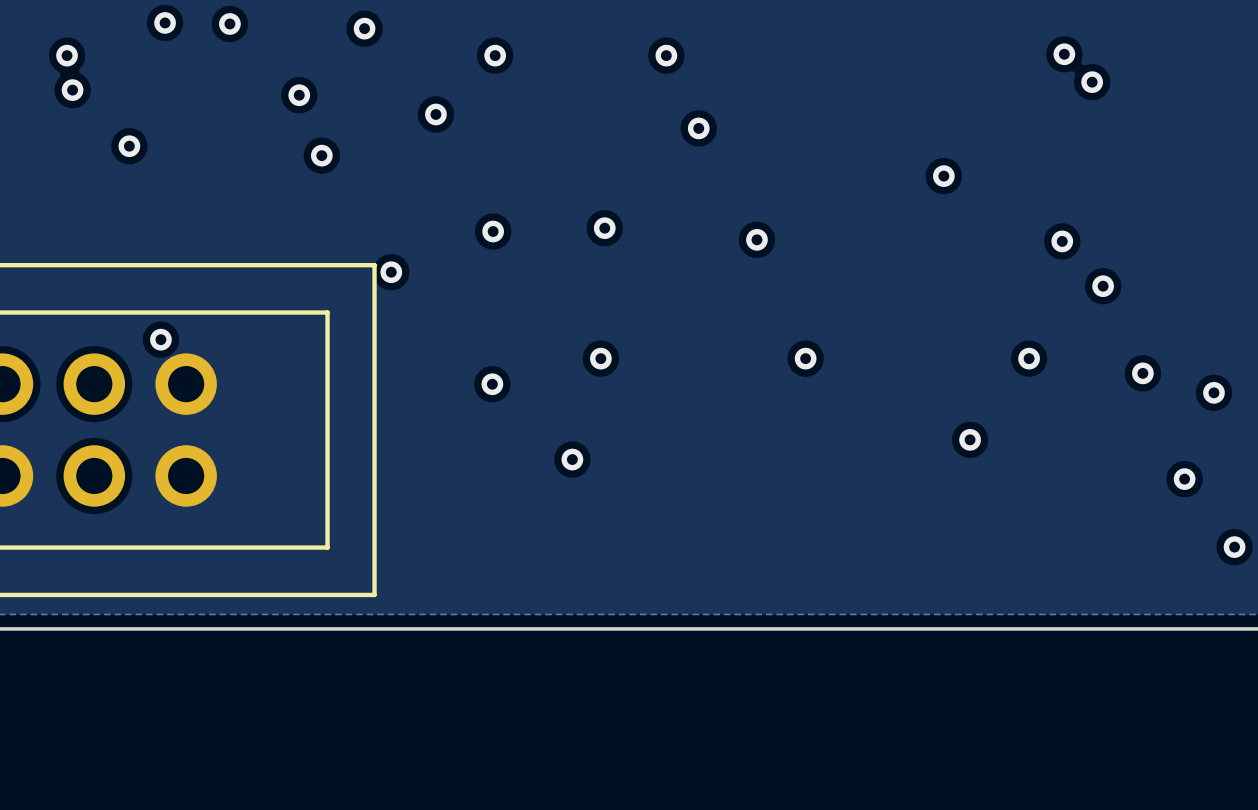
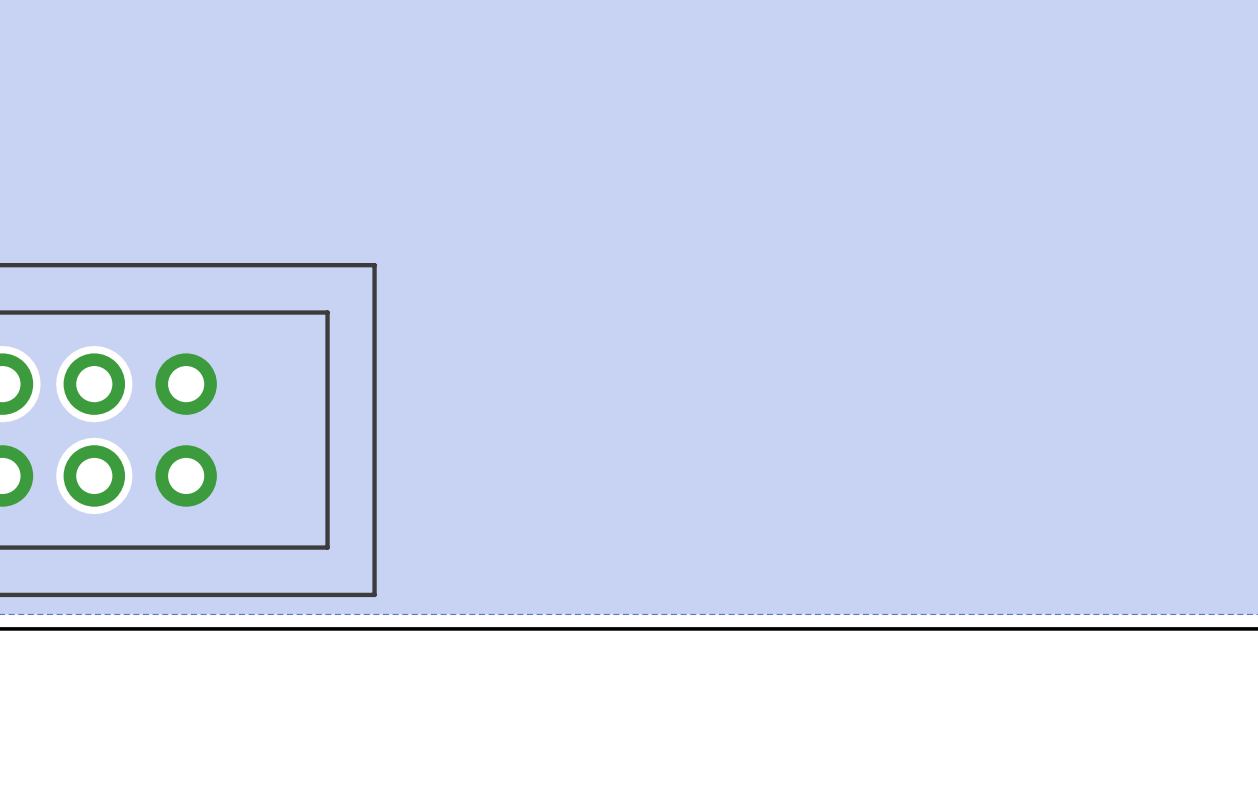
via: (165, 22) -> none
via: (229, 23) -> none
via: (364, 28) -> none
via: (1064, 54) -> none
via: (67, 55) -> none
via: (495, 55) -> none
via: (666, 55) -> none
via: (1092, 82) -> none
via: (72, 90) -> none
via: (299, 95) -> none
via: (435, 114) -> none
via: (698, 128) -> none
via: (129, 146) -> none
via: (321, 155) -> none
via: (943, 176) -> none
via: (604, 228) -> none
via: (493, 231) -> none
via: (756, 239) -> none
via: (1062, 241) -> none
via: (391, 272) -> none
via: (1103, 286) -> none
via: (160, 339) -> none
via: (600, 358) -> none
via: (805, 358) -> none
via: (1029, 358) -> none
via: (1142, 373) -> none
via: (492, 384) -> none
via: (1213, 392) -> none
via: (970, 439) -> none
via: (572, 459) -> none
via: (1184, 479) -> none
via: (1234, 547) -> none

